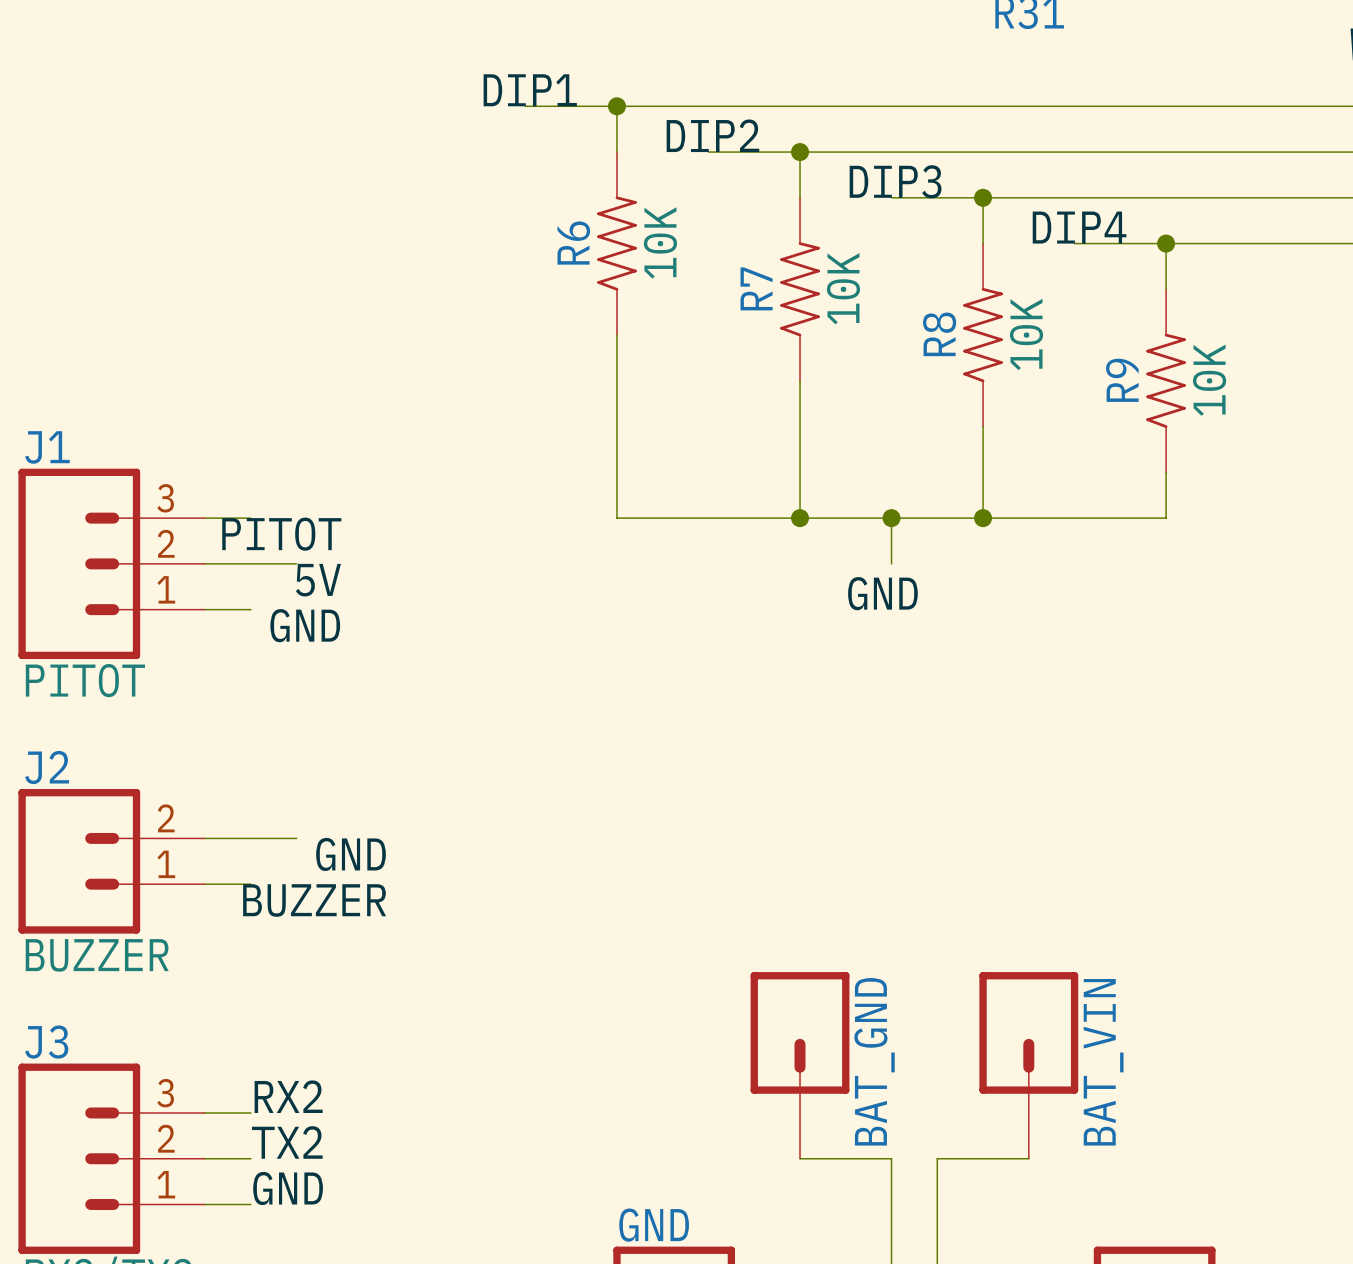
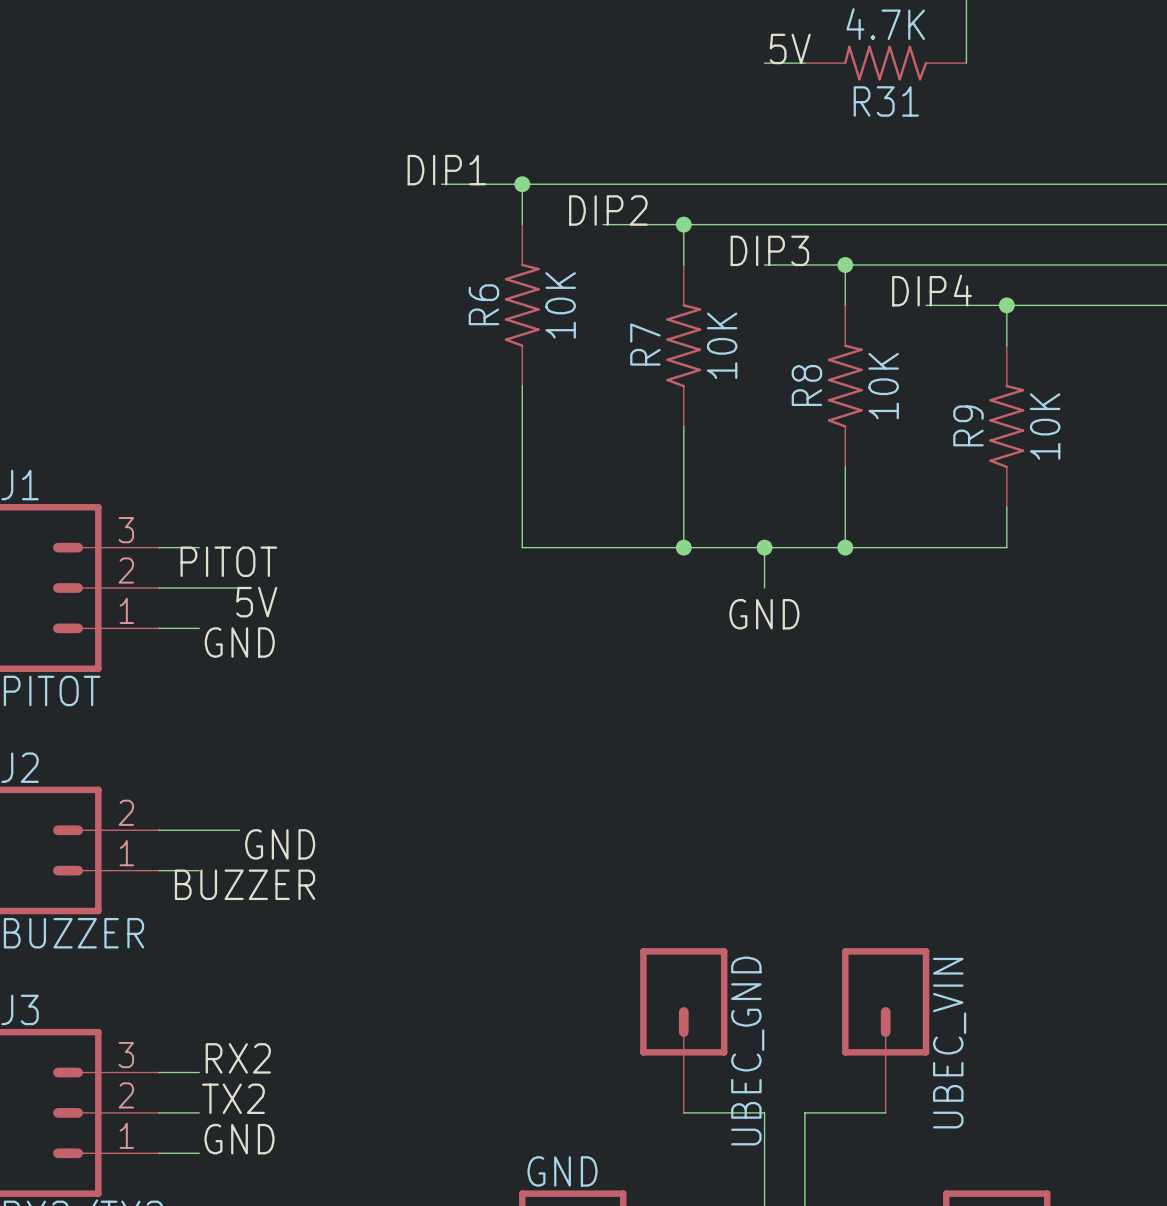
BAT_GND name: BAT_GND (874, 1061) -> UBEC_GND (747, 1051)
BAT_VIN name: BAT_VIN (1103, 1062) -> UBEC_VIN (949, 1043)

